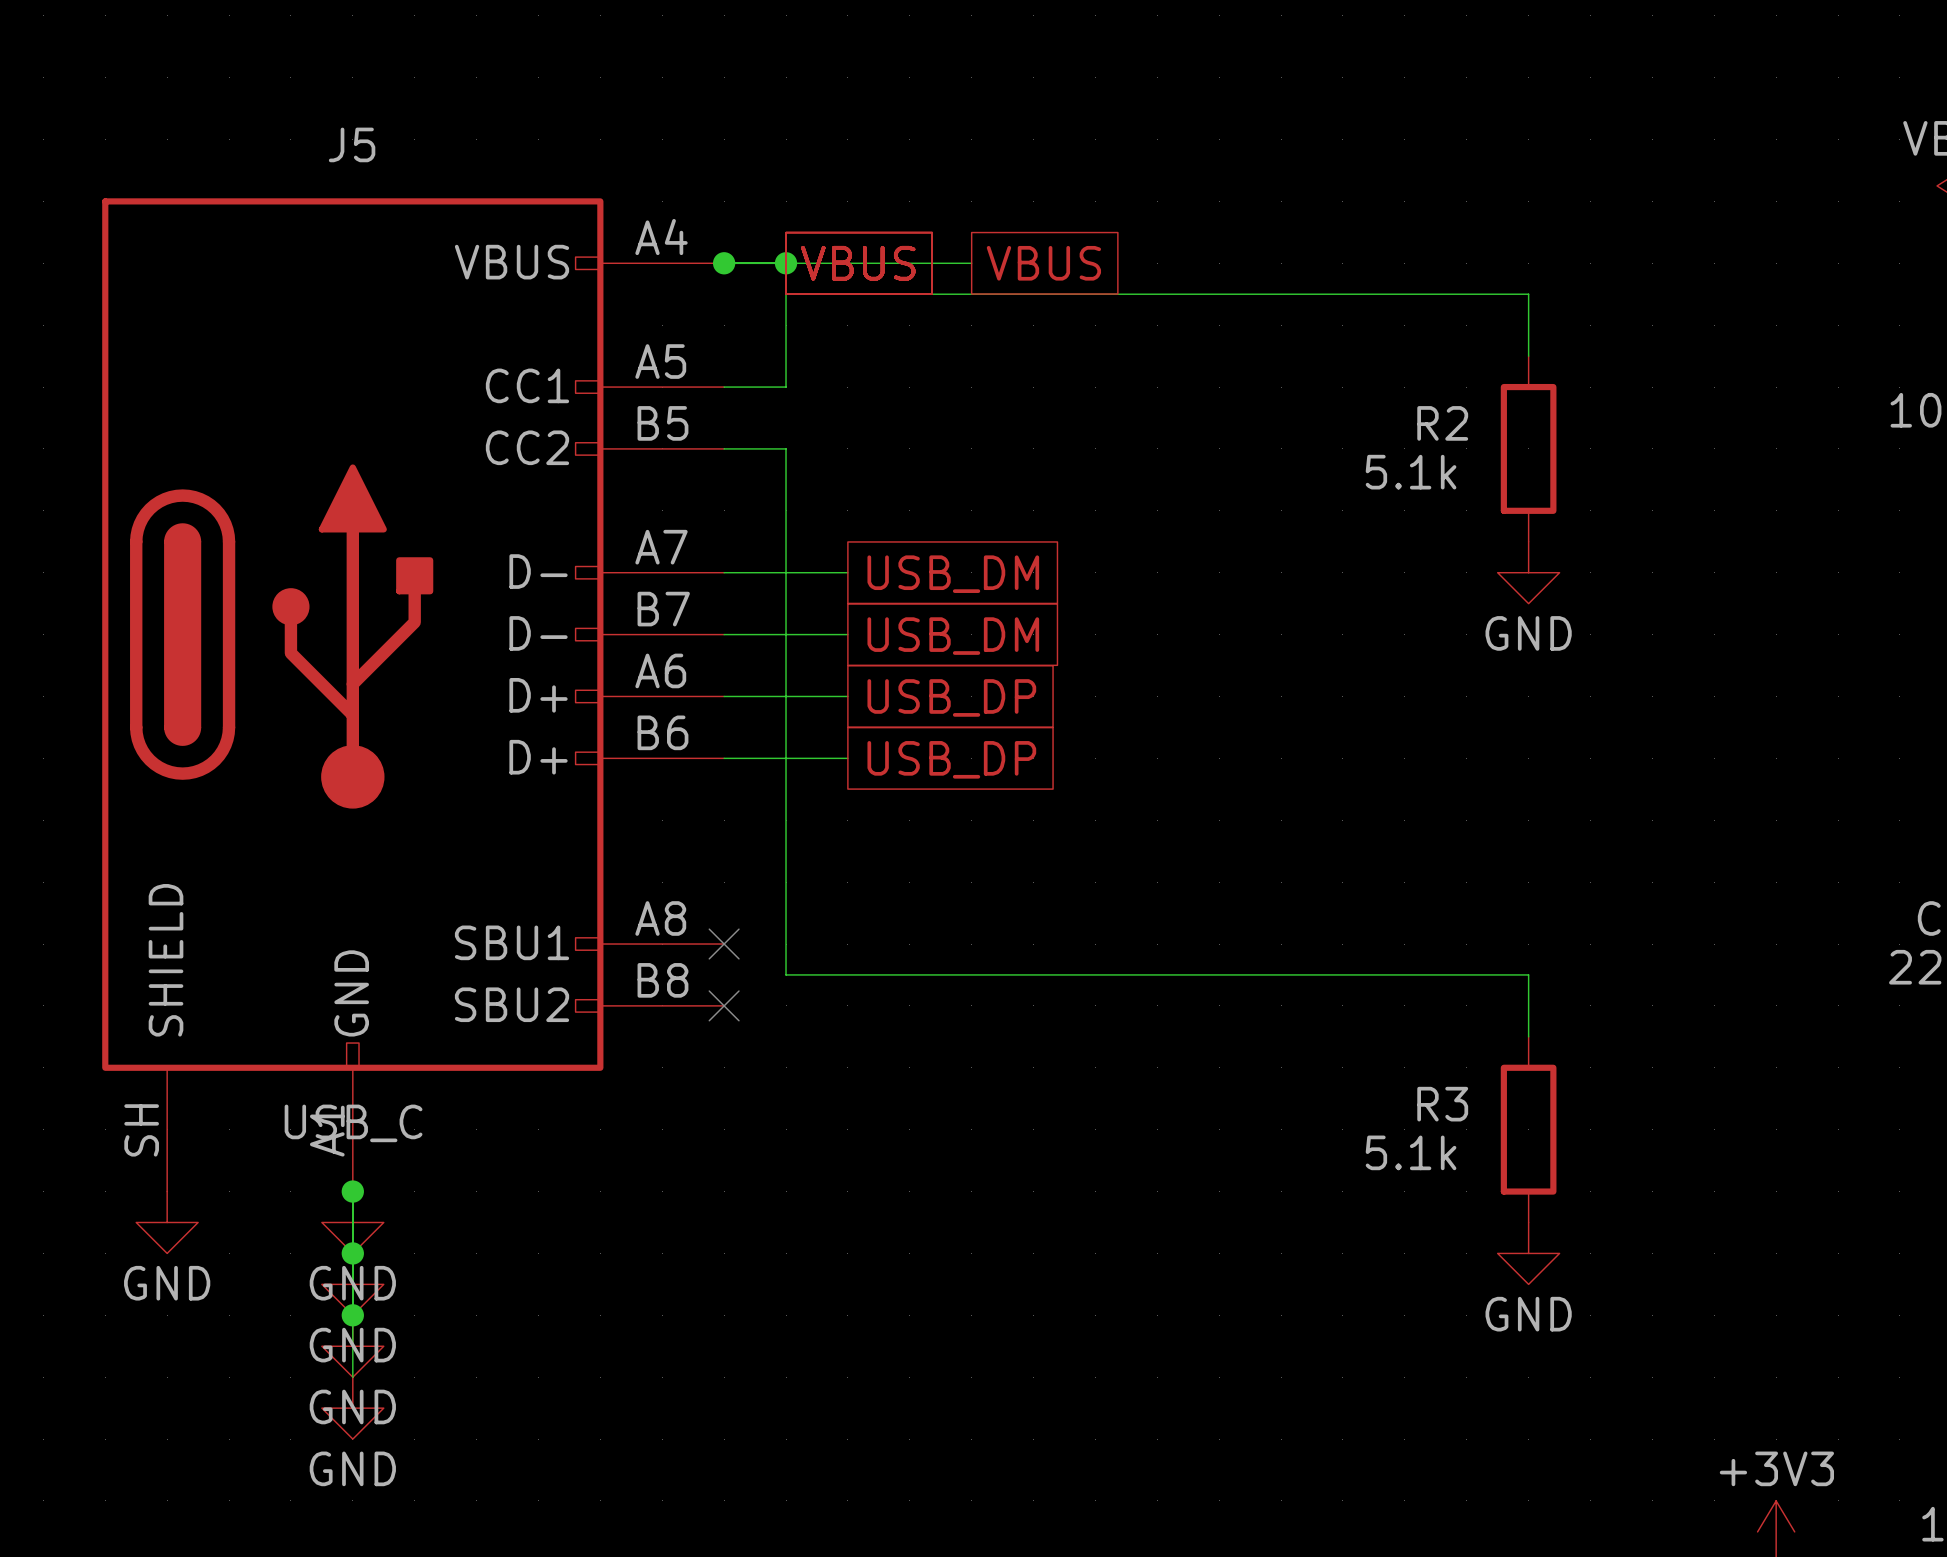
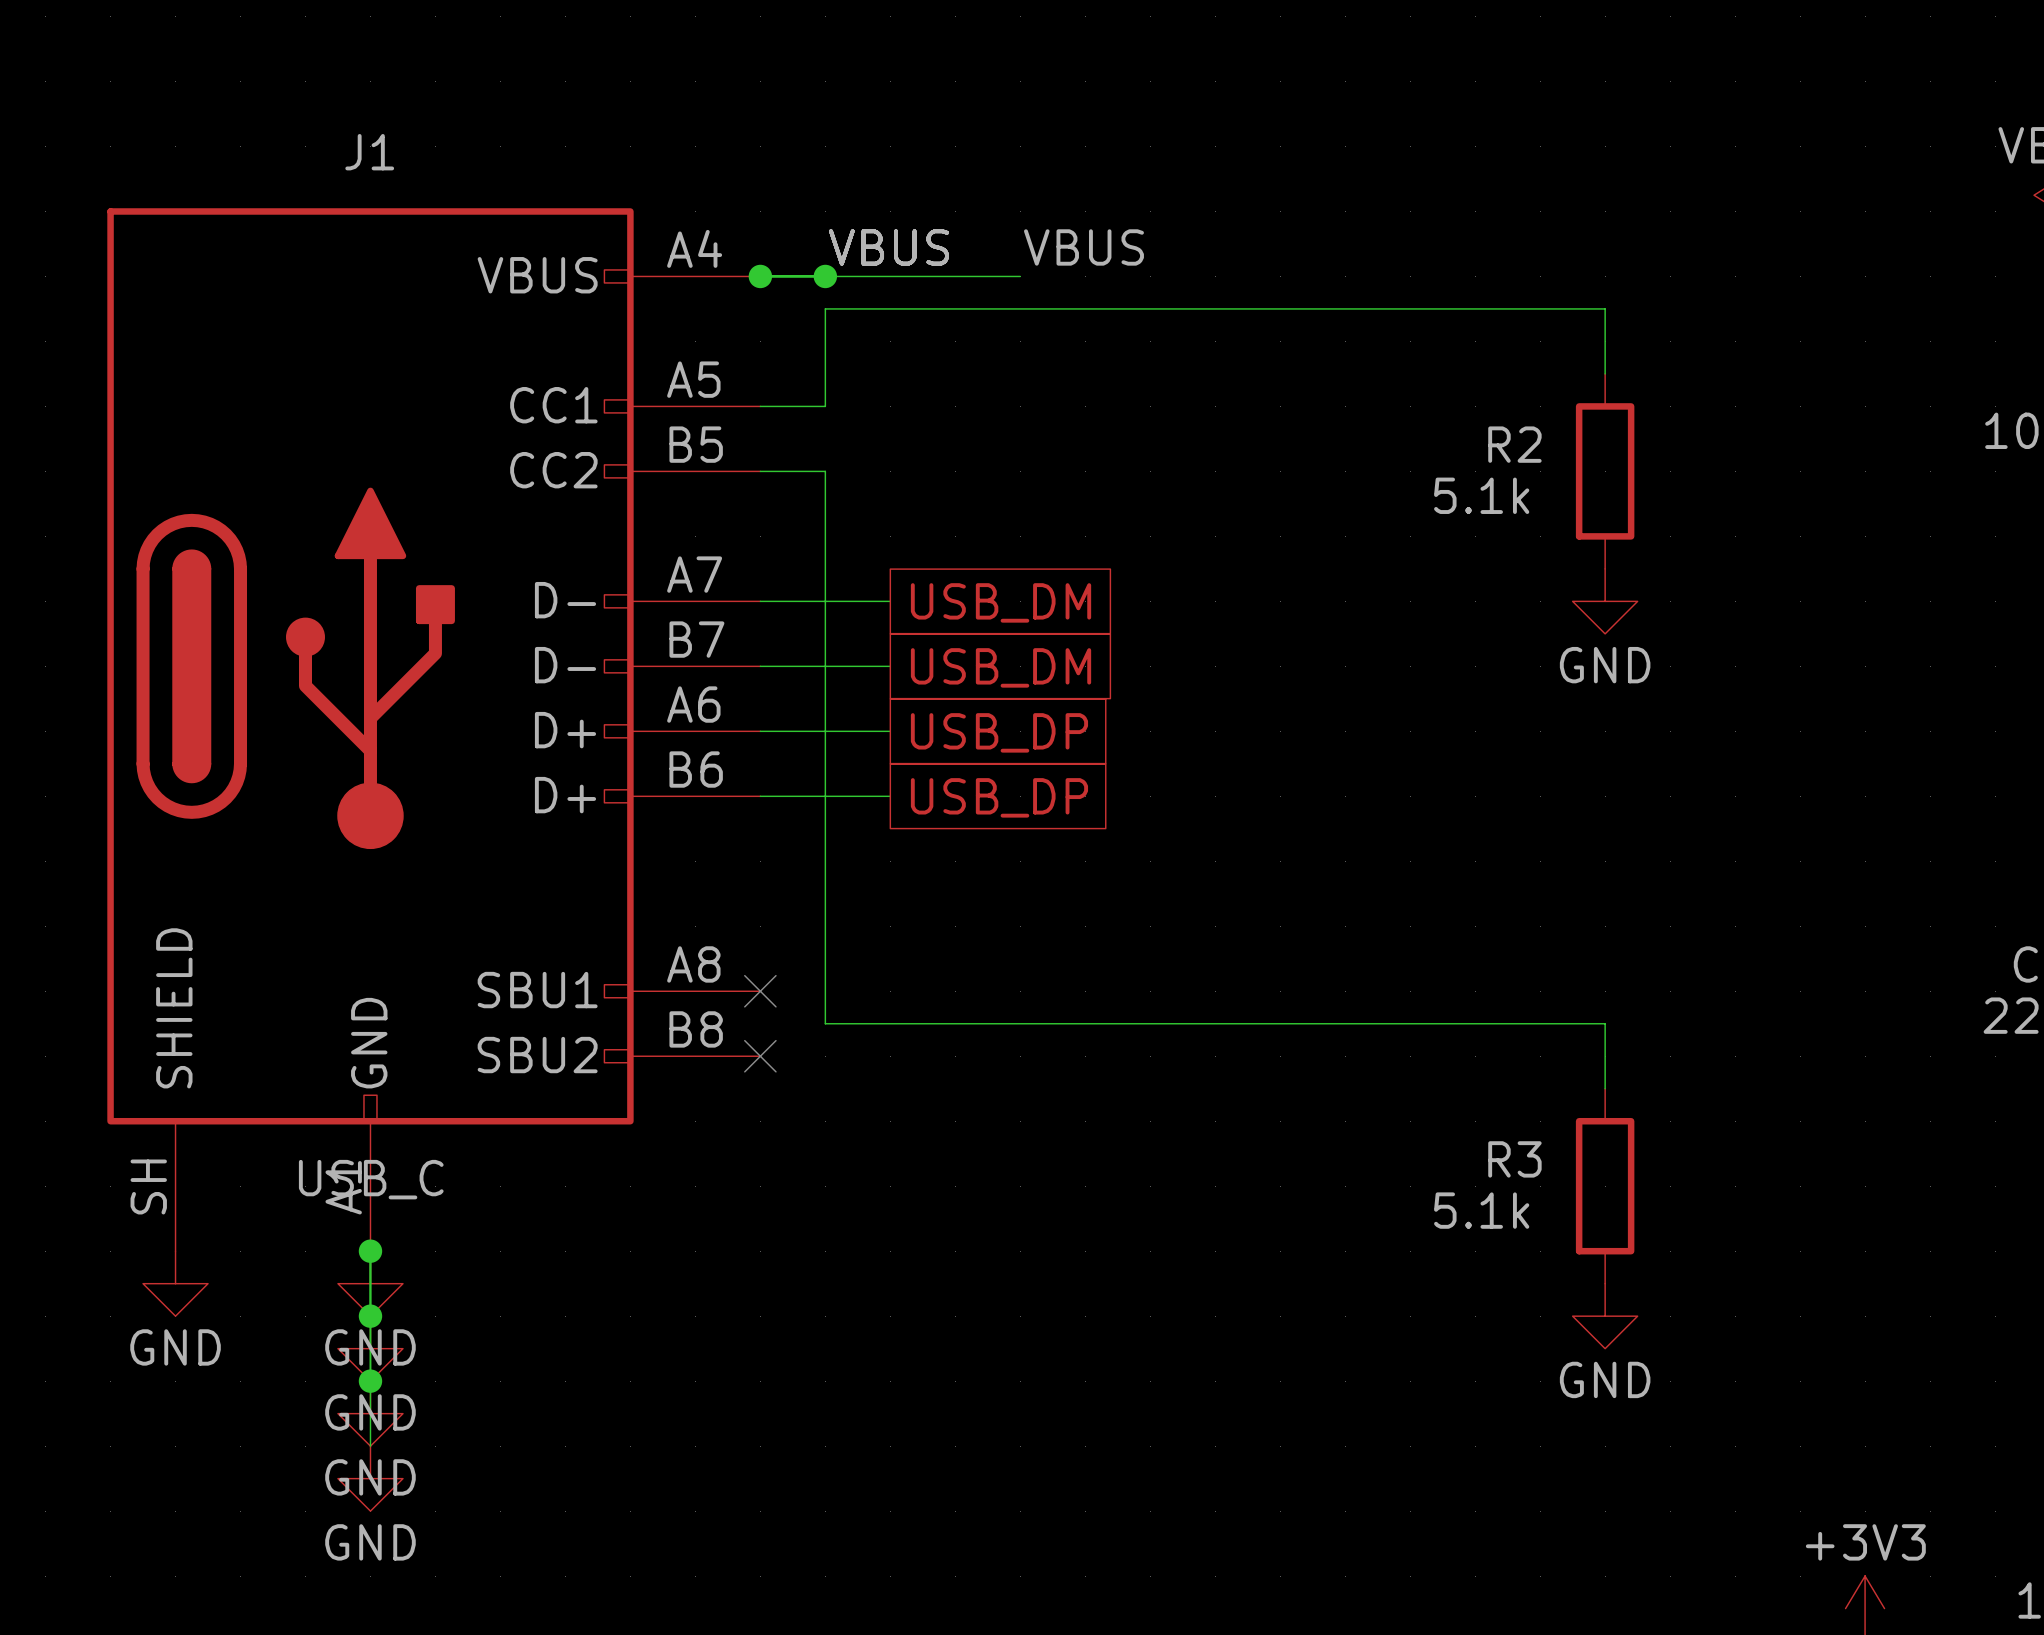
J5 name: J5 (352, 144) -> J1 (369, 152)
label: none -> VBUS (889, 247)
label: none -> VBUS (1083, 247)
global label: VBUS (858, 263) -> none
global label: VBUS (1043, 263) -> none

